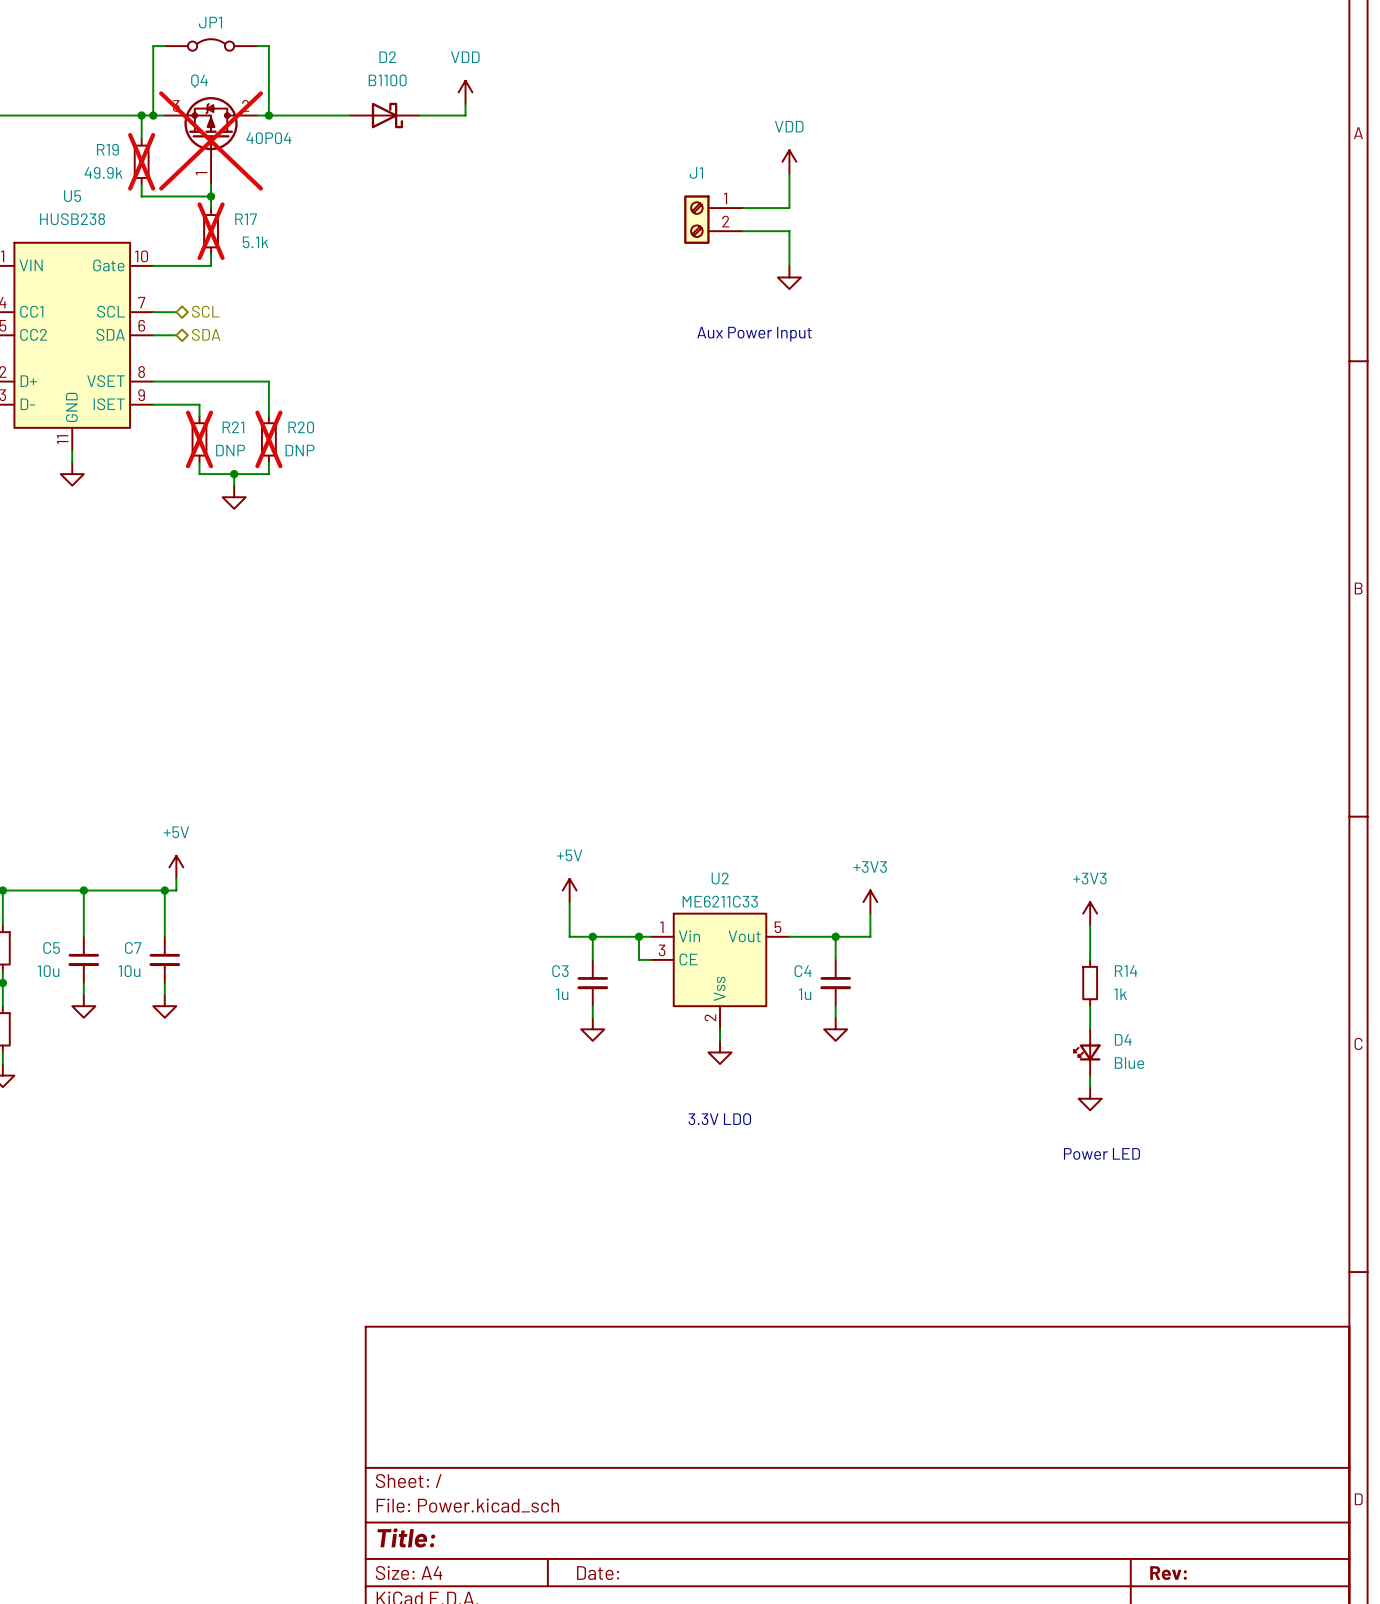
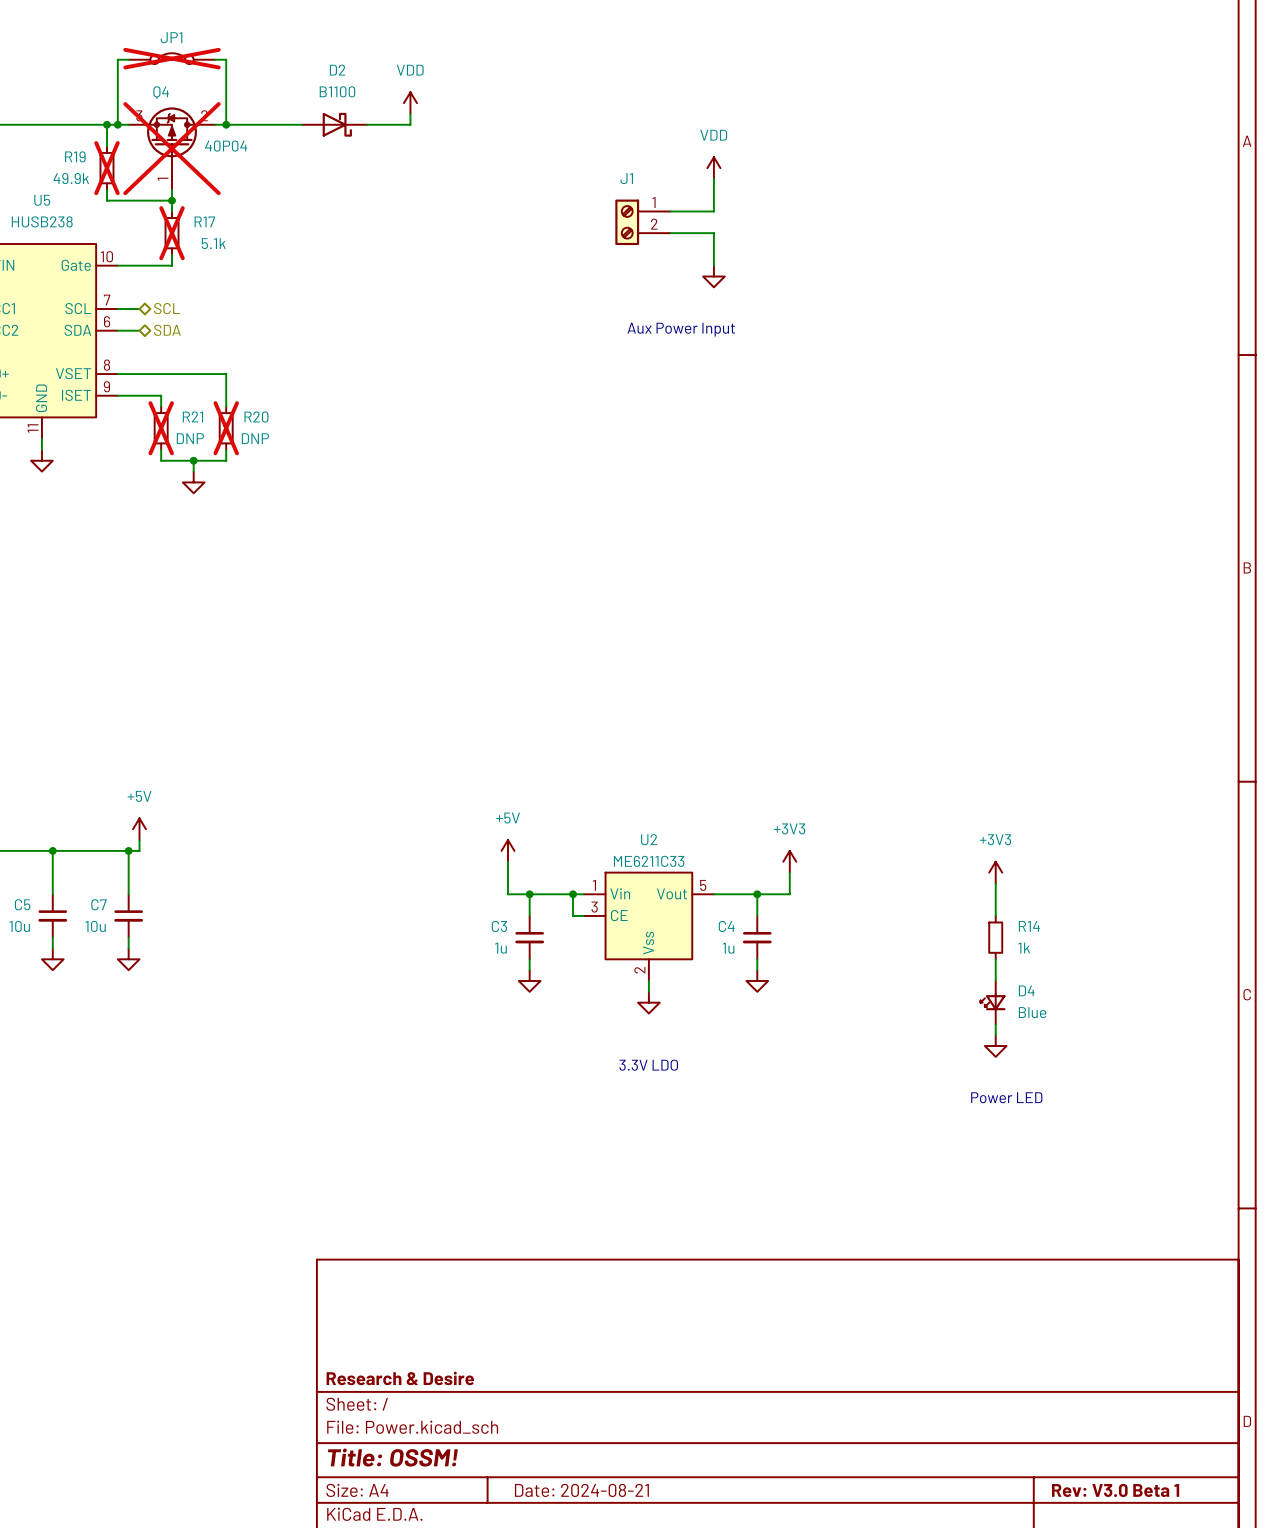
JP1 do-not-place cross: none -> (172, 58)
title block: none -> Research & Desire (400, 1378)
title block: Title: (406, 1537) -> Title: OSSM! (392, 1457)
title block: Date: (598, 1573) -> Date: 2024-08-21 (581, 1490)
title block: Rev: (1168, 1573) -> Rev: V3.0 Beta 1 (1115, 1490)

